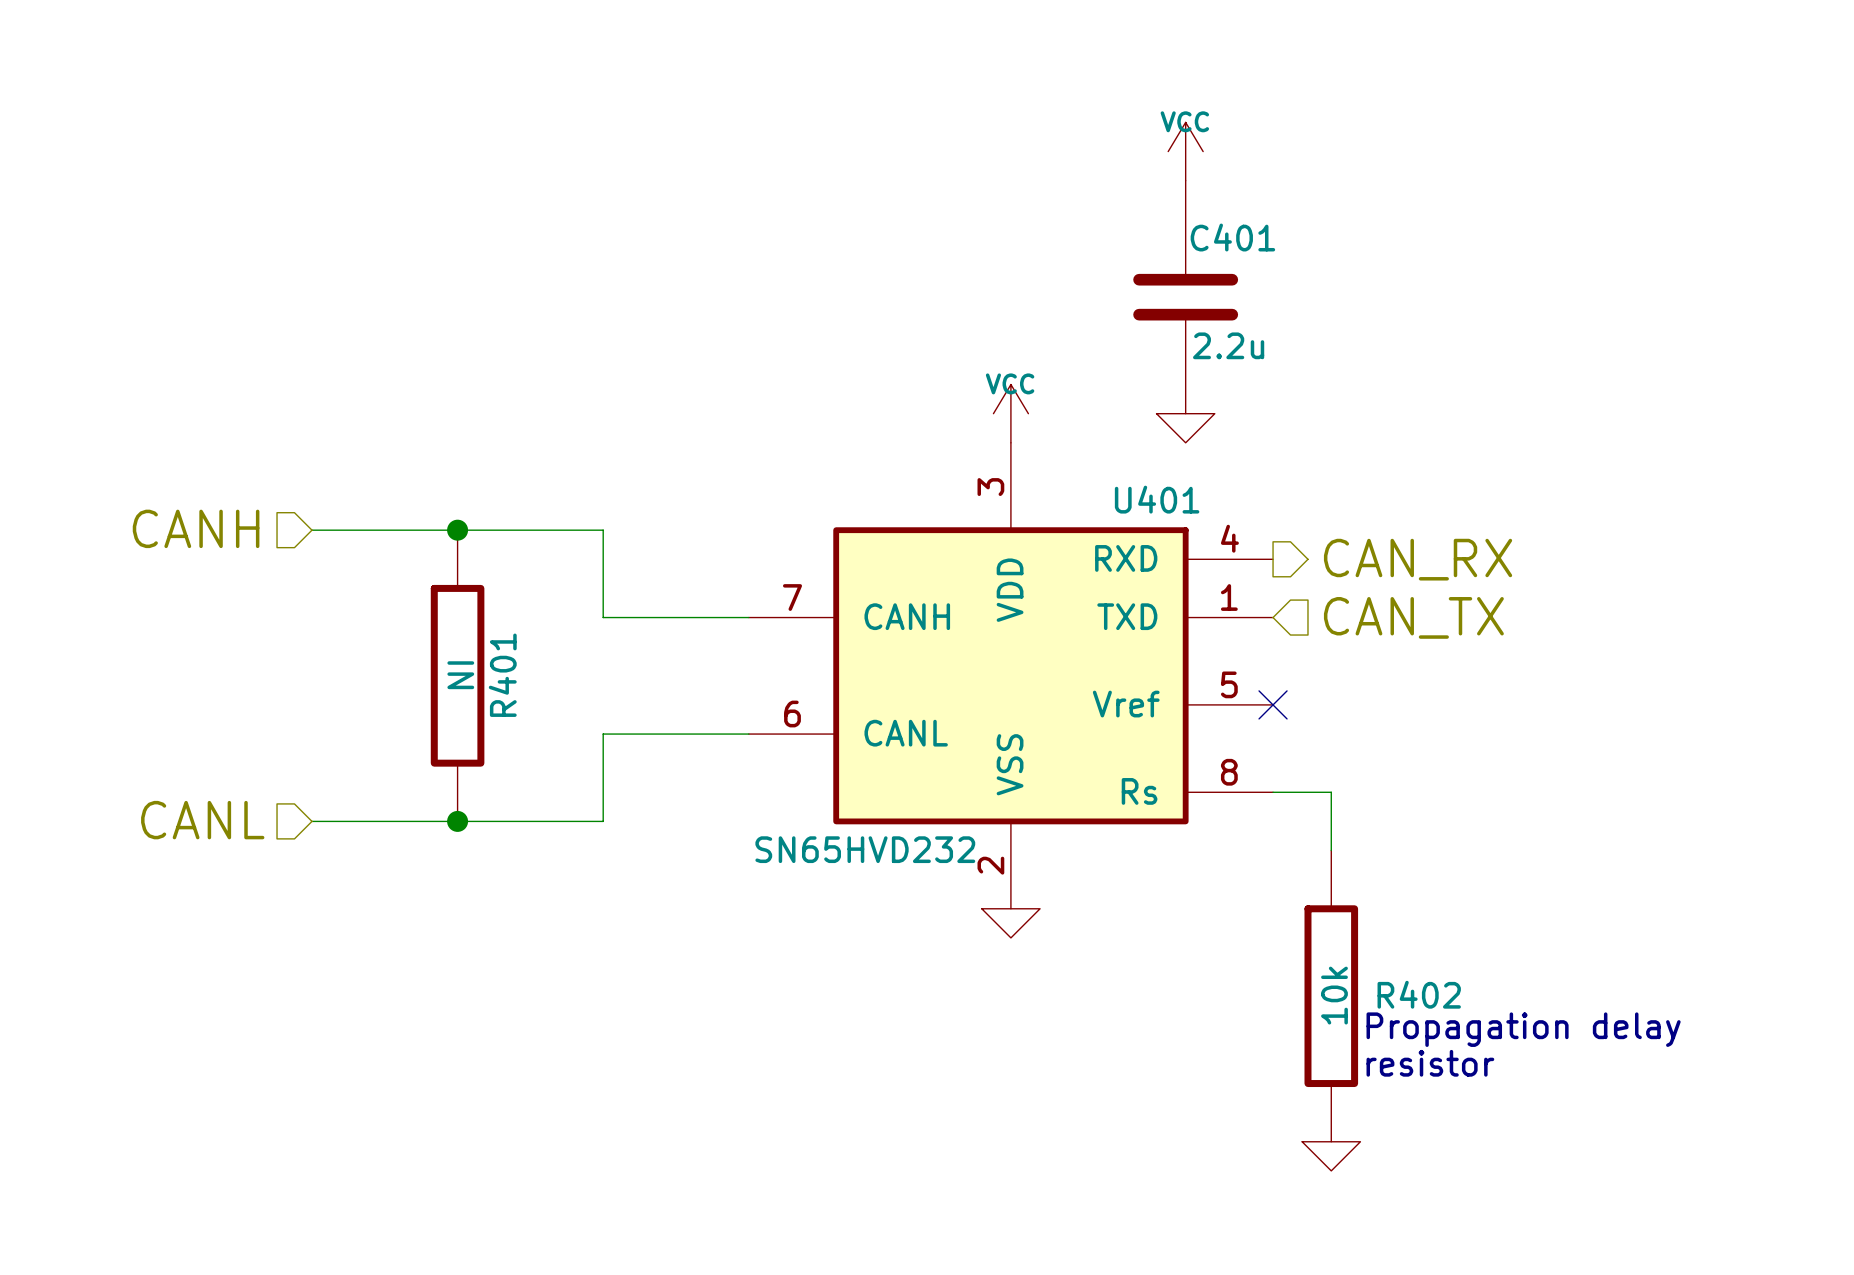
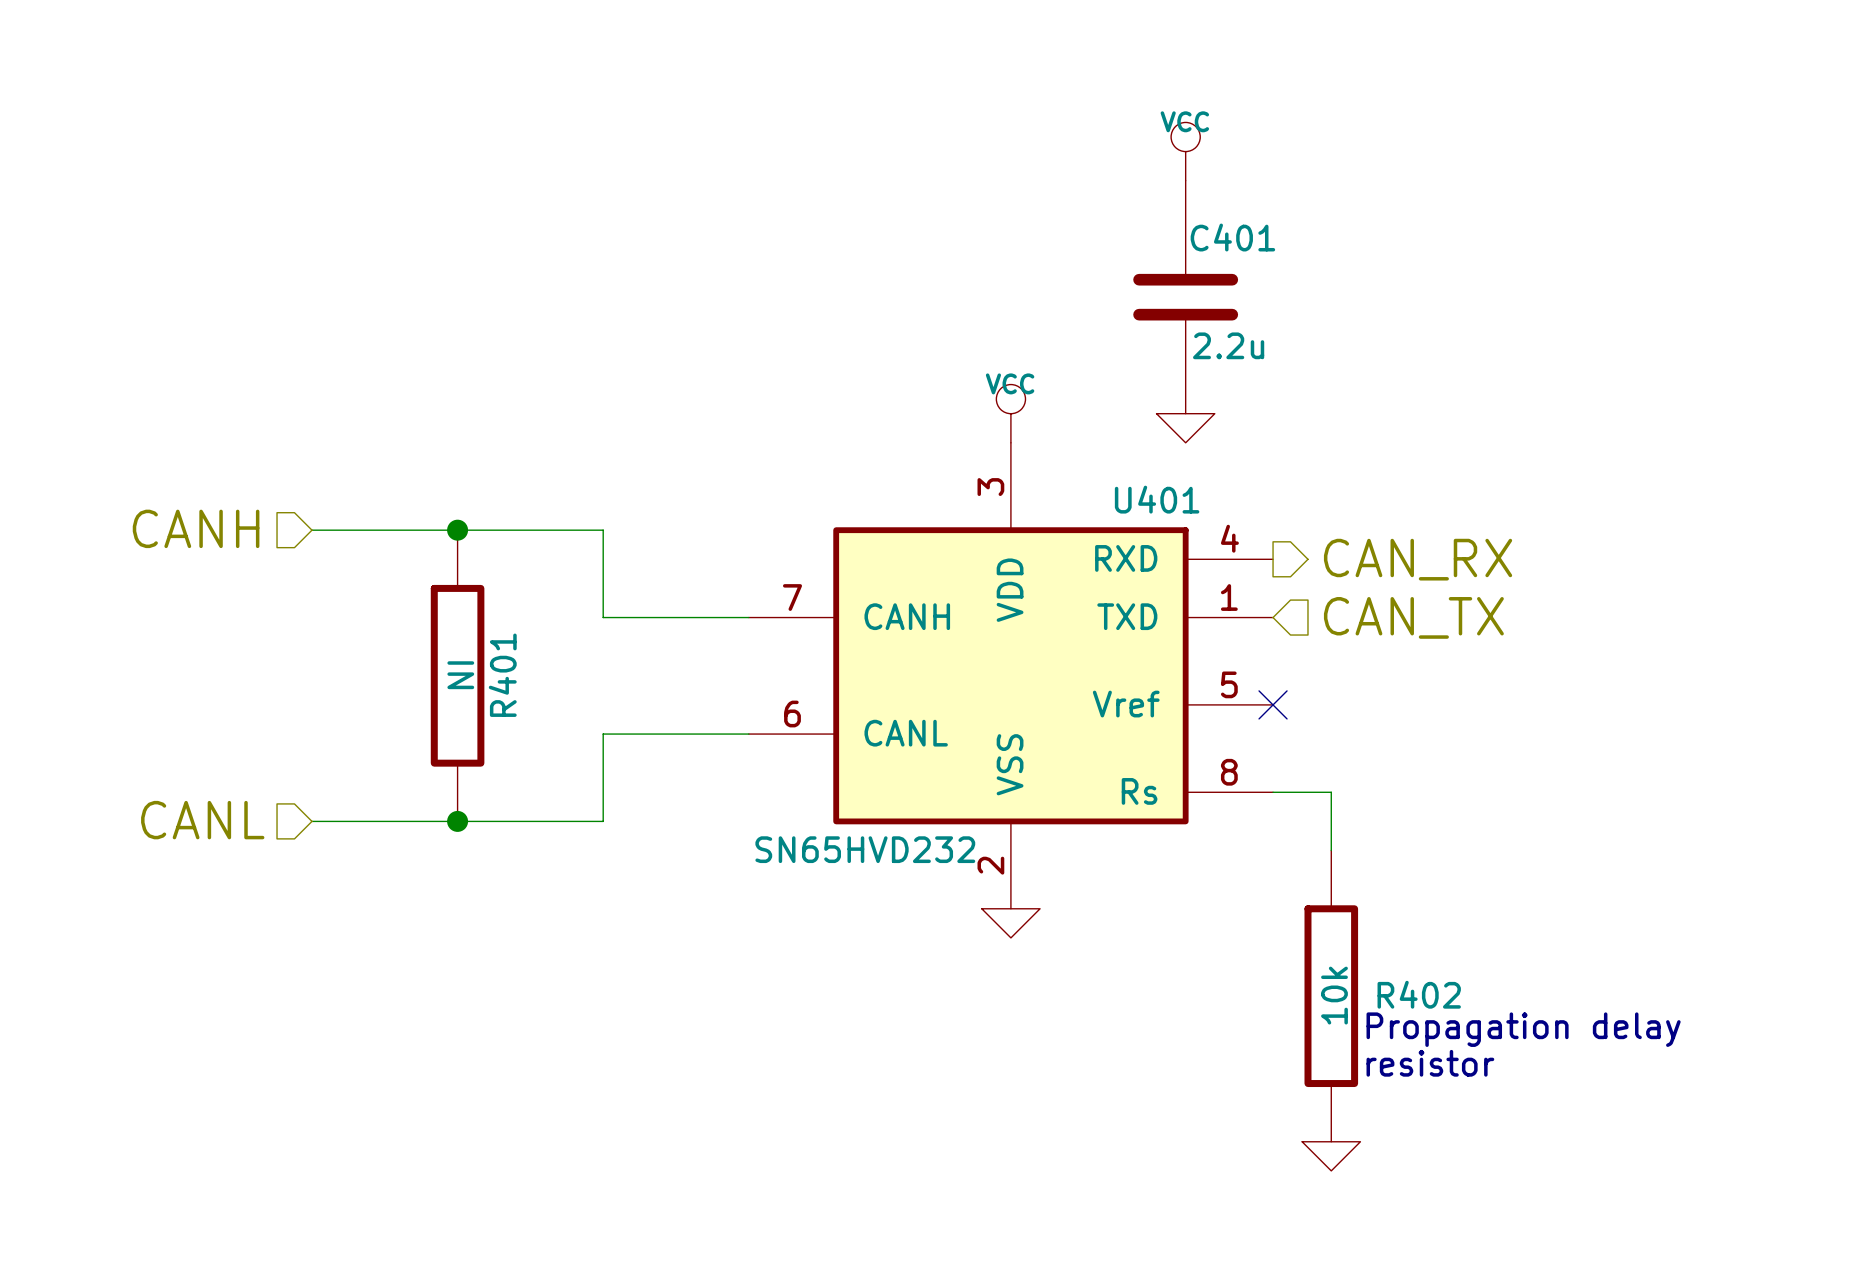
power symbol shape: [1168, 122, 1204, 181] -> [1171, 122, 1201, 181]
power symbol shape: [993, 384, 1029, 443] -> [996, 384, 1026, 443]

